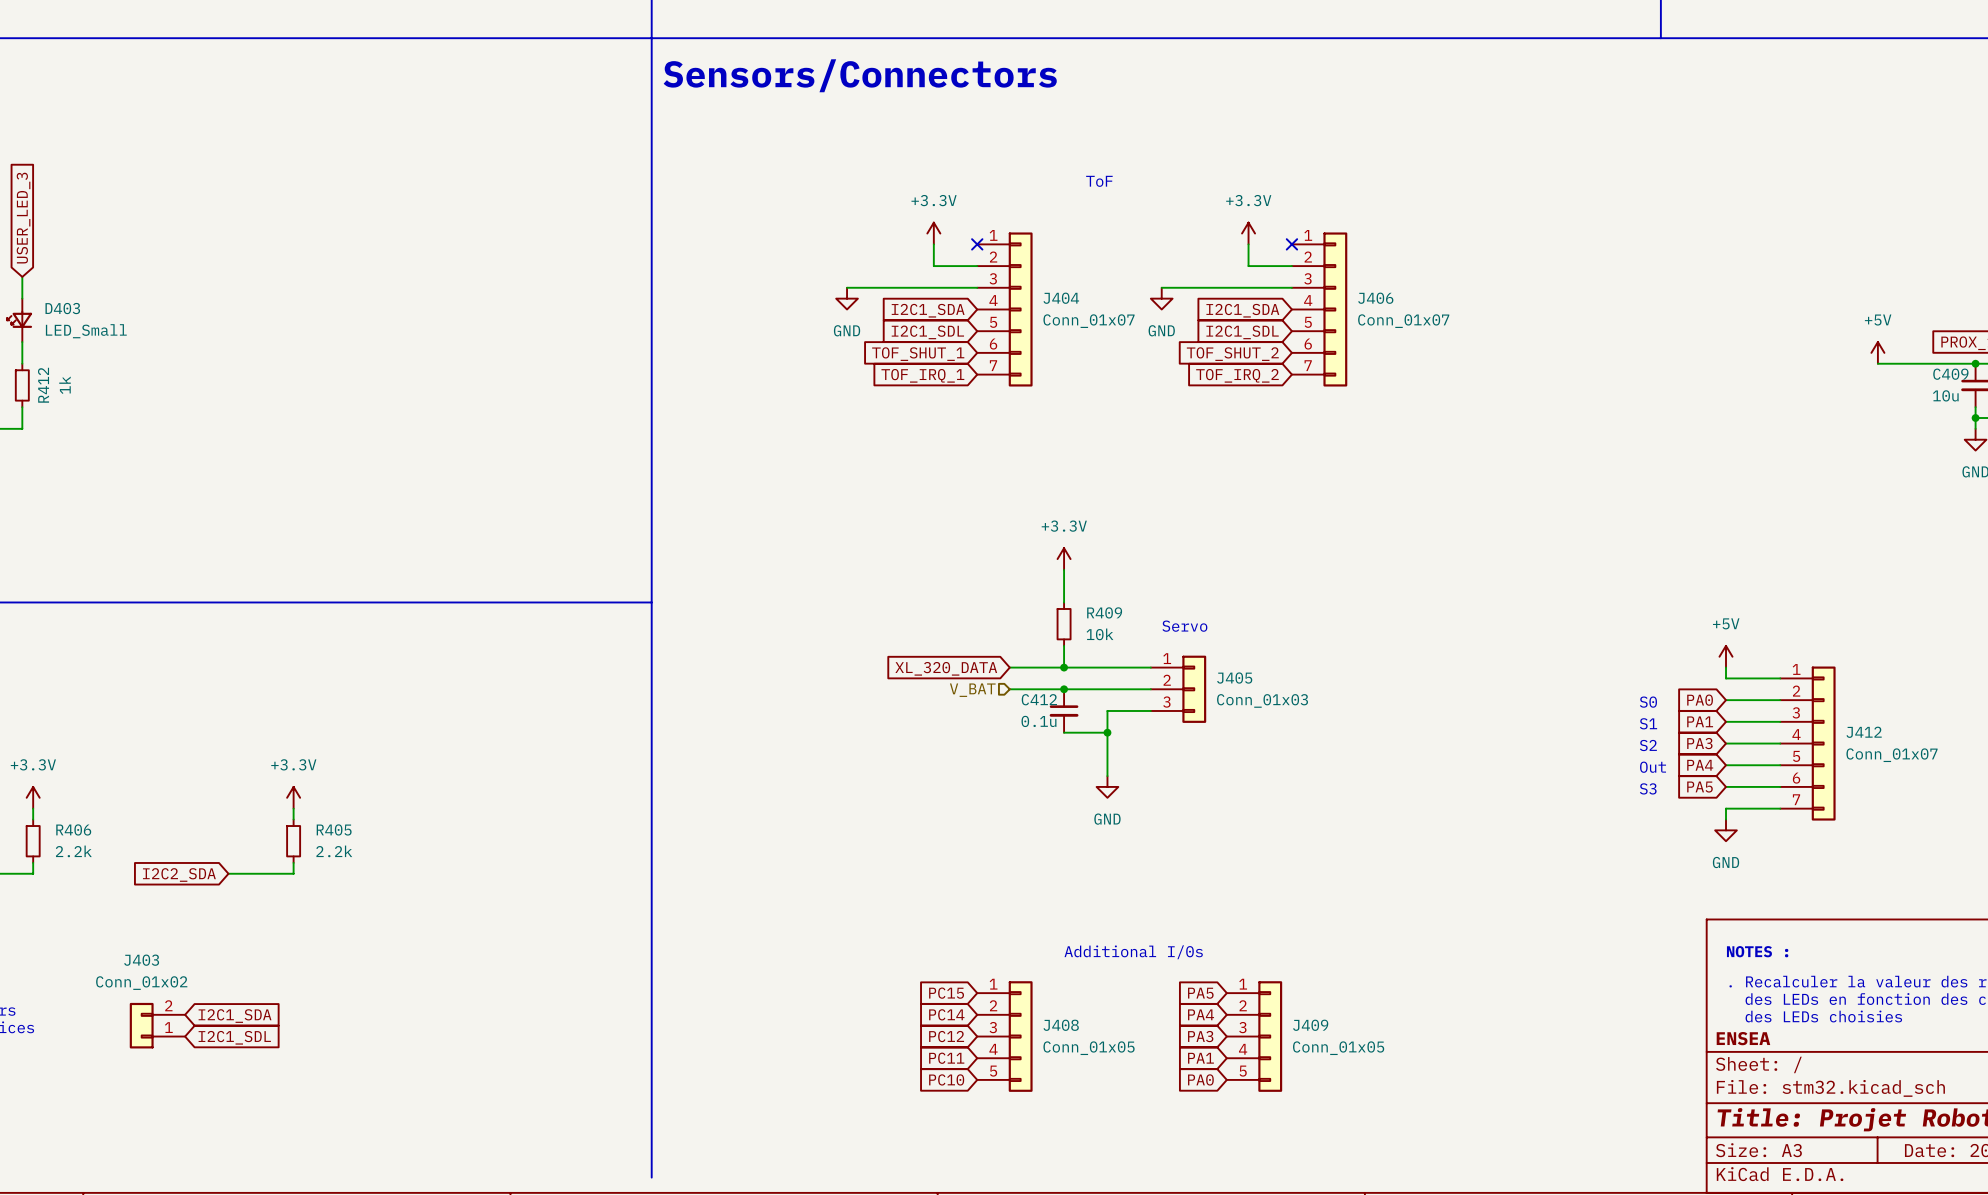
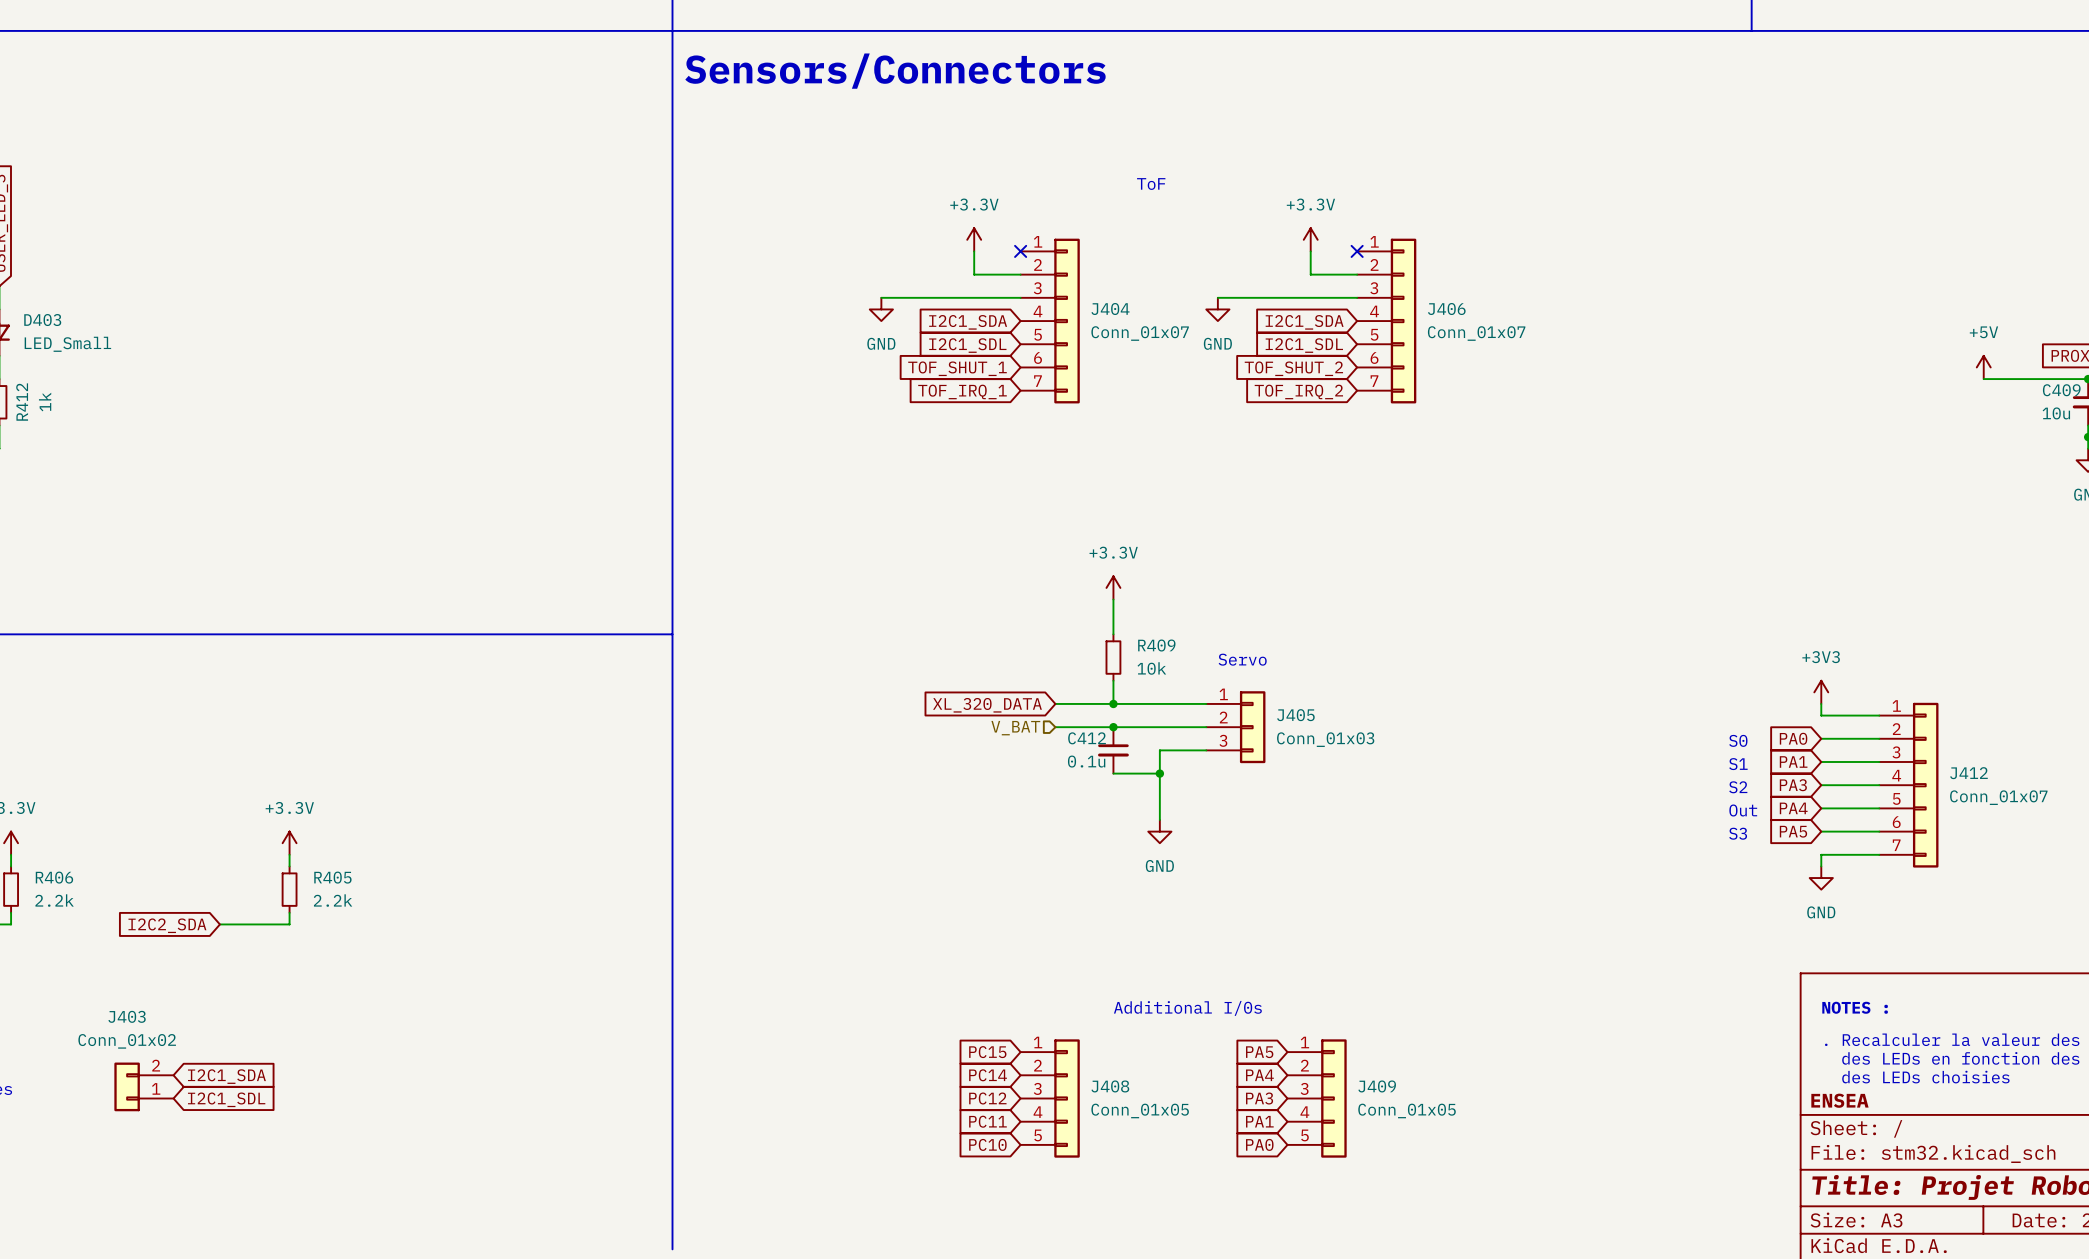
power symbol: +5V (1726, 656) -> +3V3 (1821, 692)

